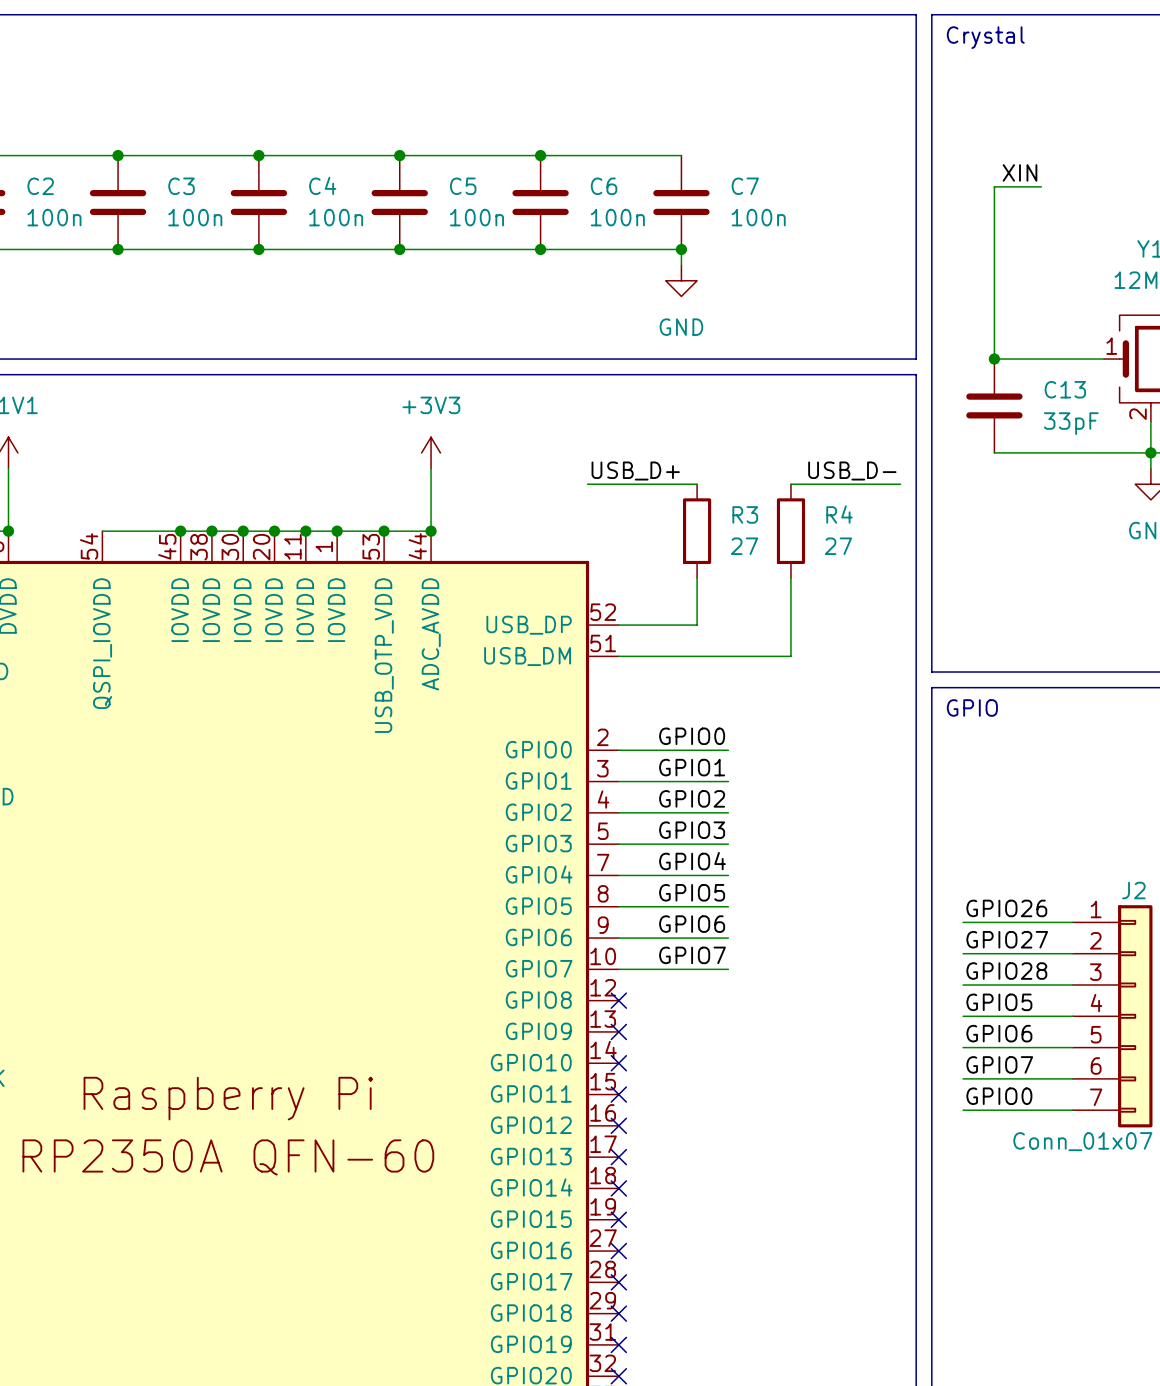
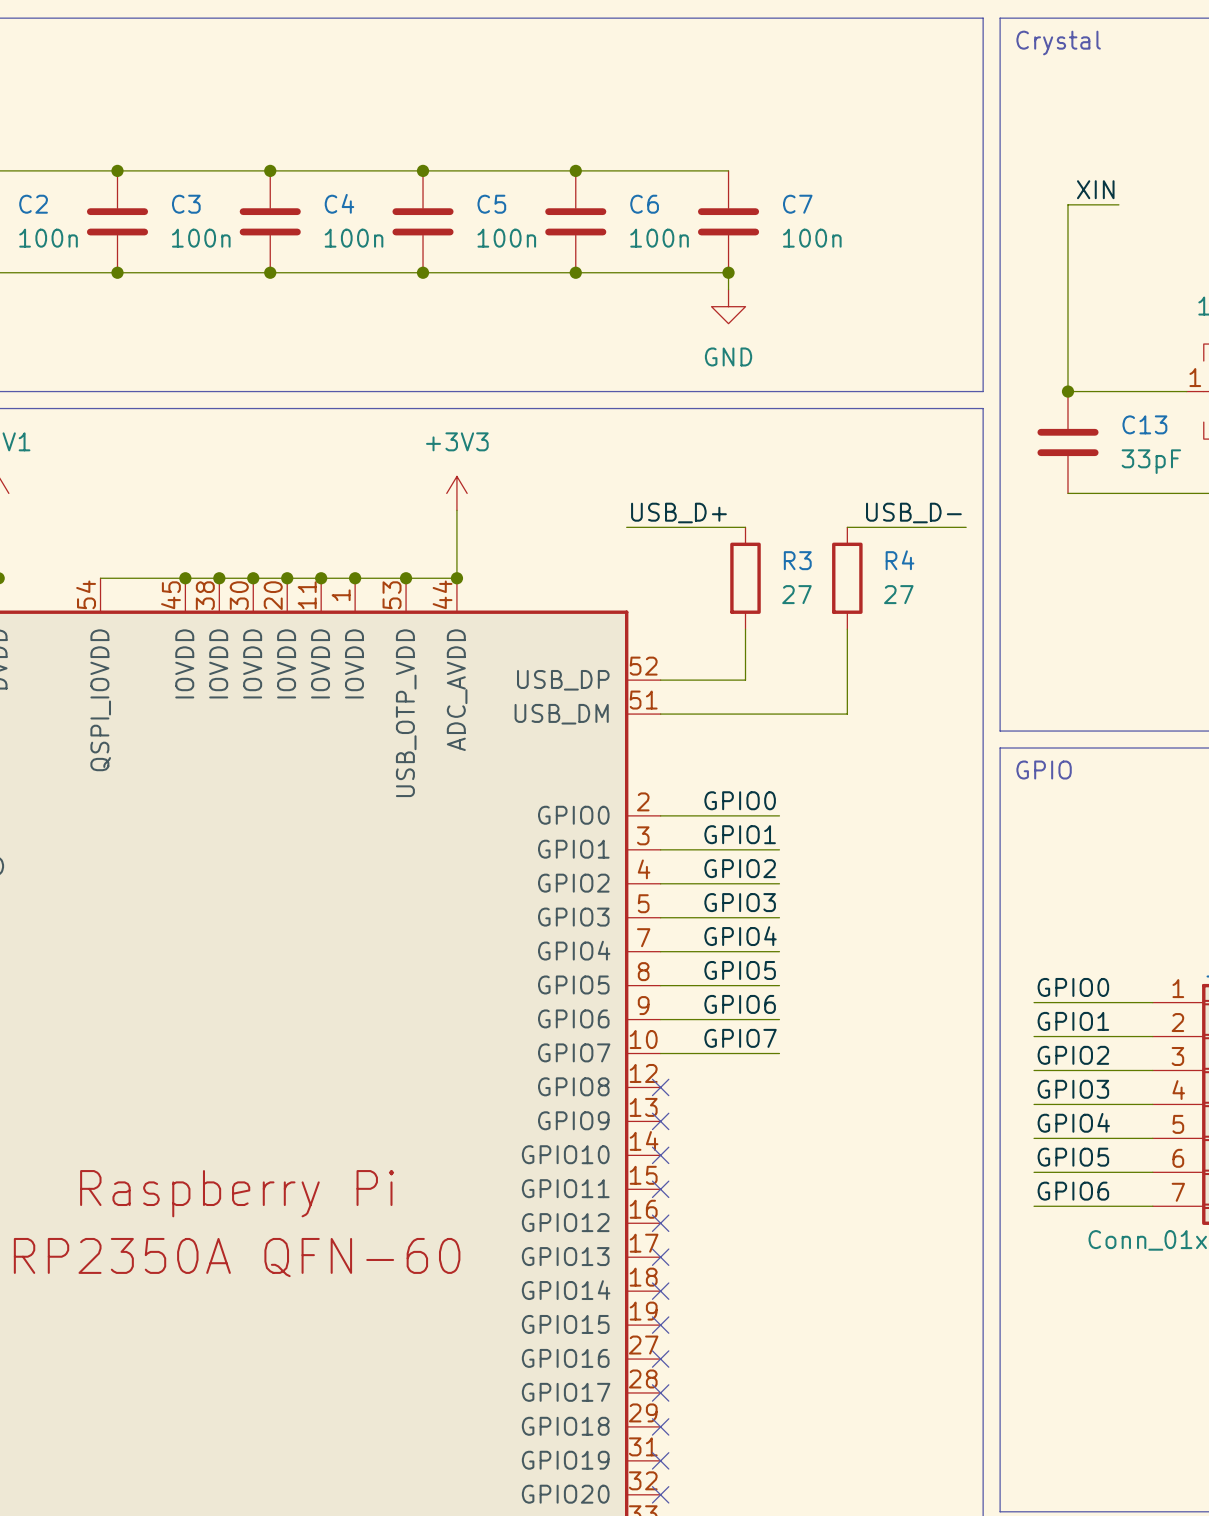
label: GPIO26 (1006, 908) -> GPIO0 (1073, 987)
label: GPIO27 (1007, 939) -> GPIO1 (1073, 1021)
label: GPIO28 (1006, 971) -> GPIO2 (1073, 1055)
label: GPIO5 (999, 1002) -> GPIO3 (1073, 1089)
label: GPIO6 (999, 1033) -> GPIO4 (1073, 1122)
label: GPIO7 (999, 1064) -> GPIO5 (1073, 1157)
label: GPIO0 (999, 1096) -> GPIO6 (1073, 1191)

